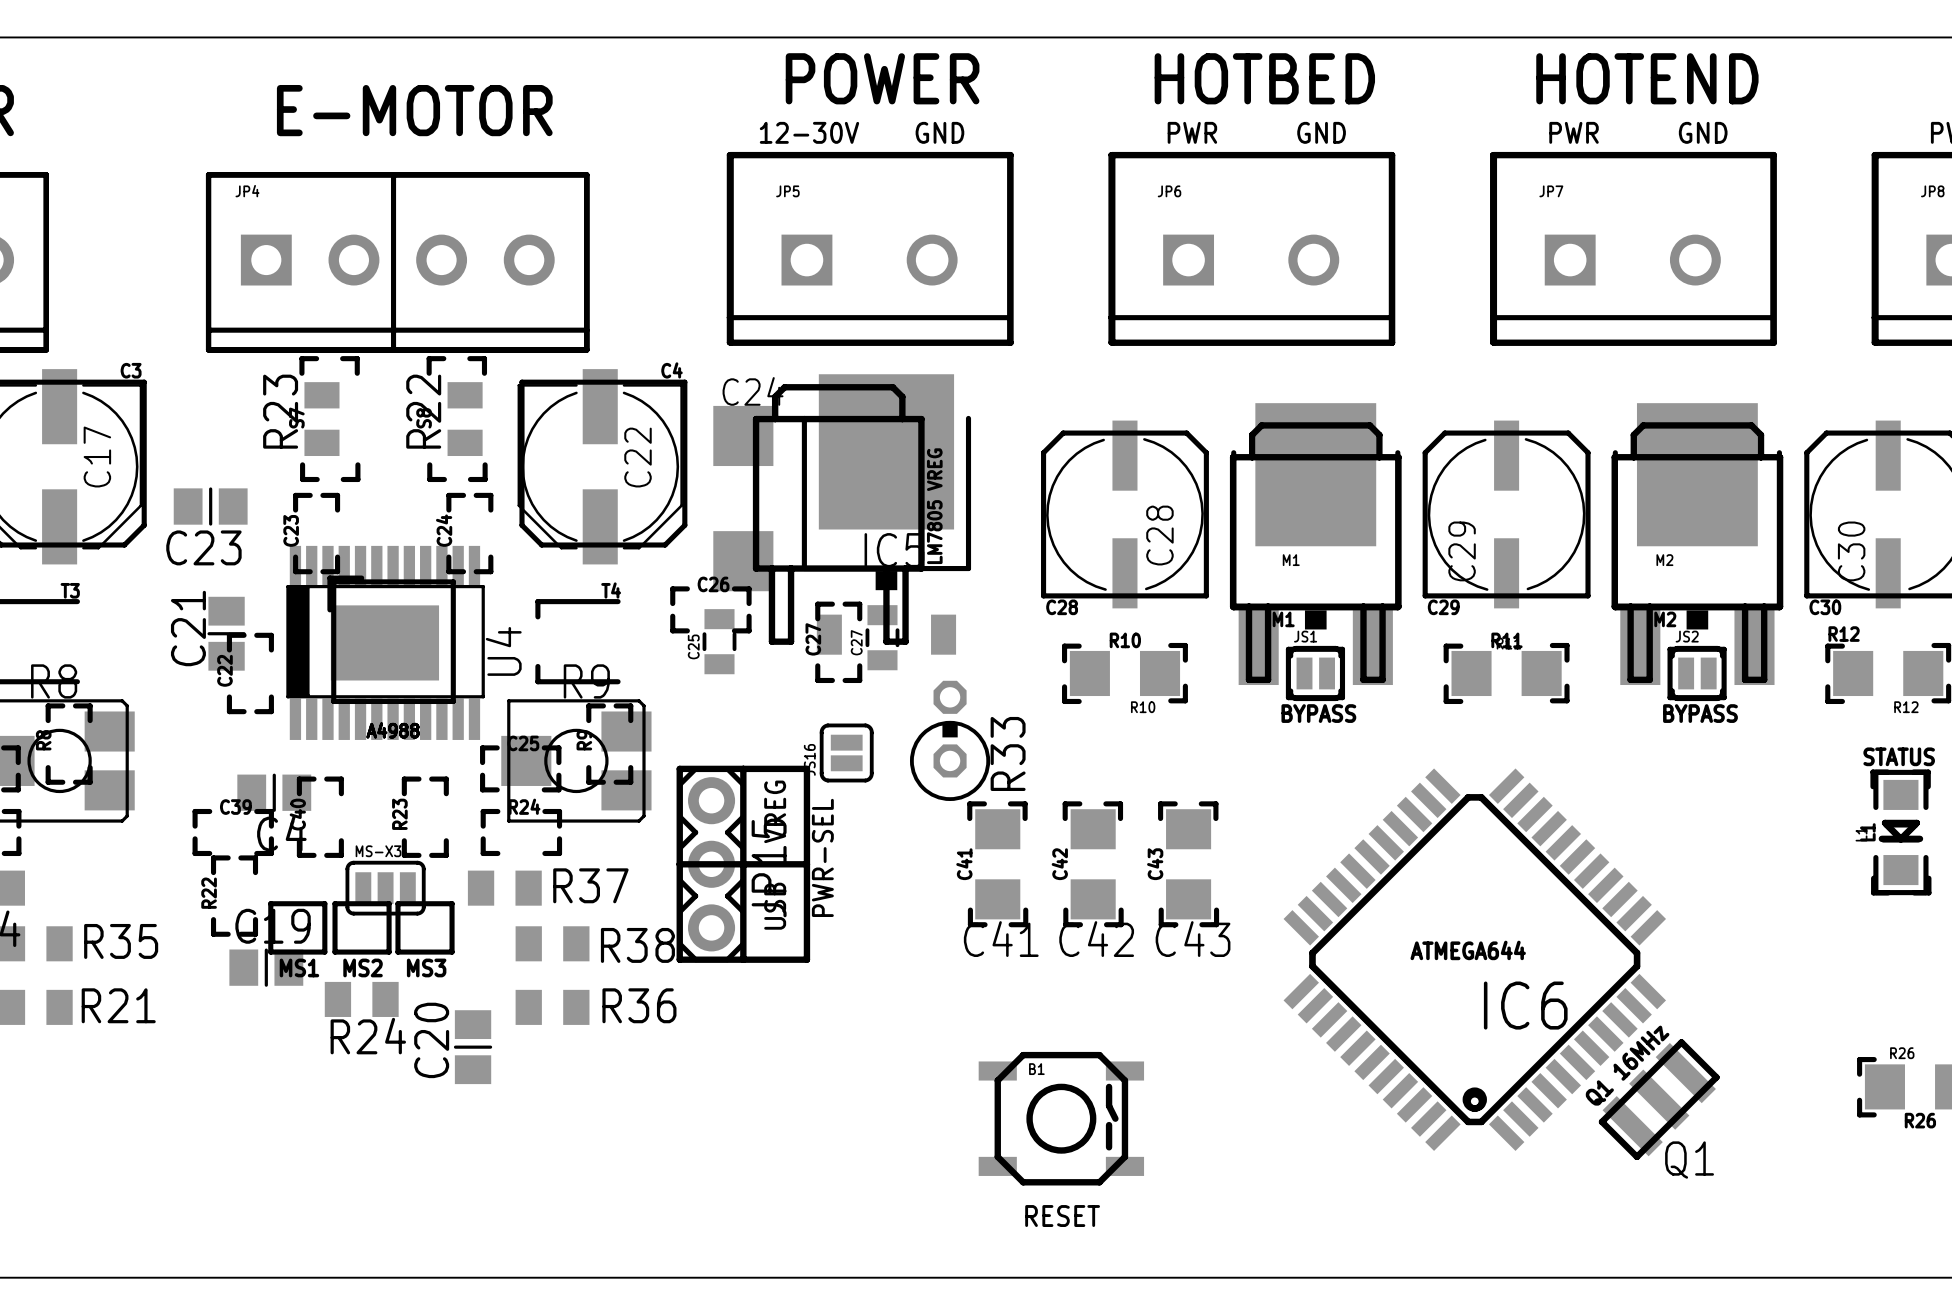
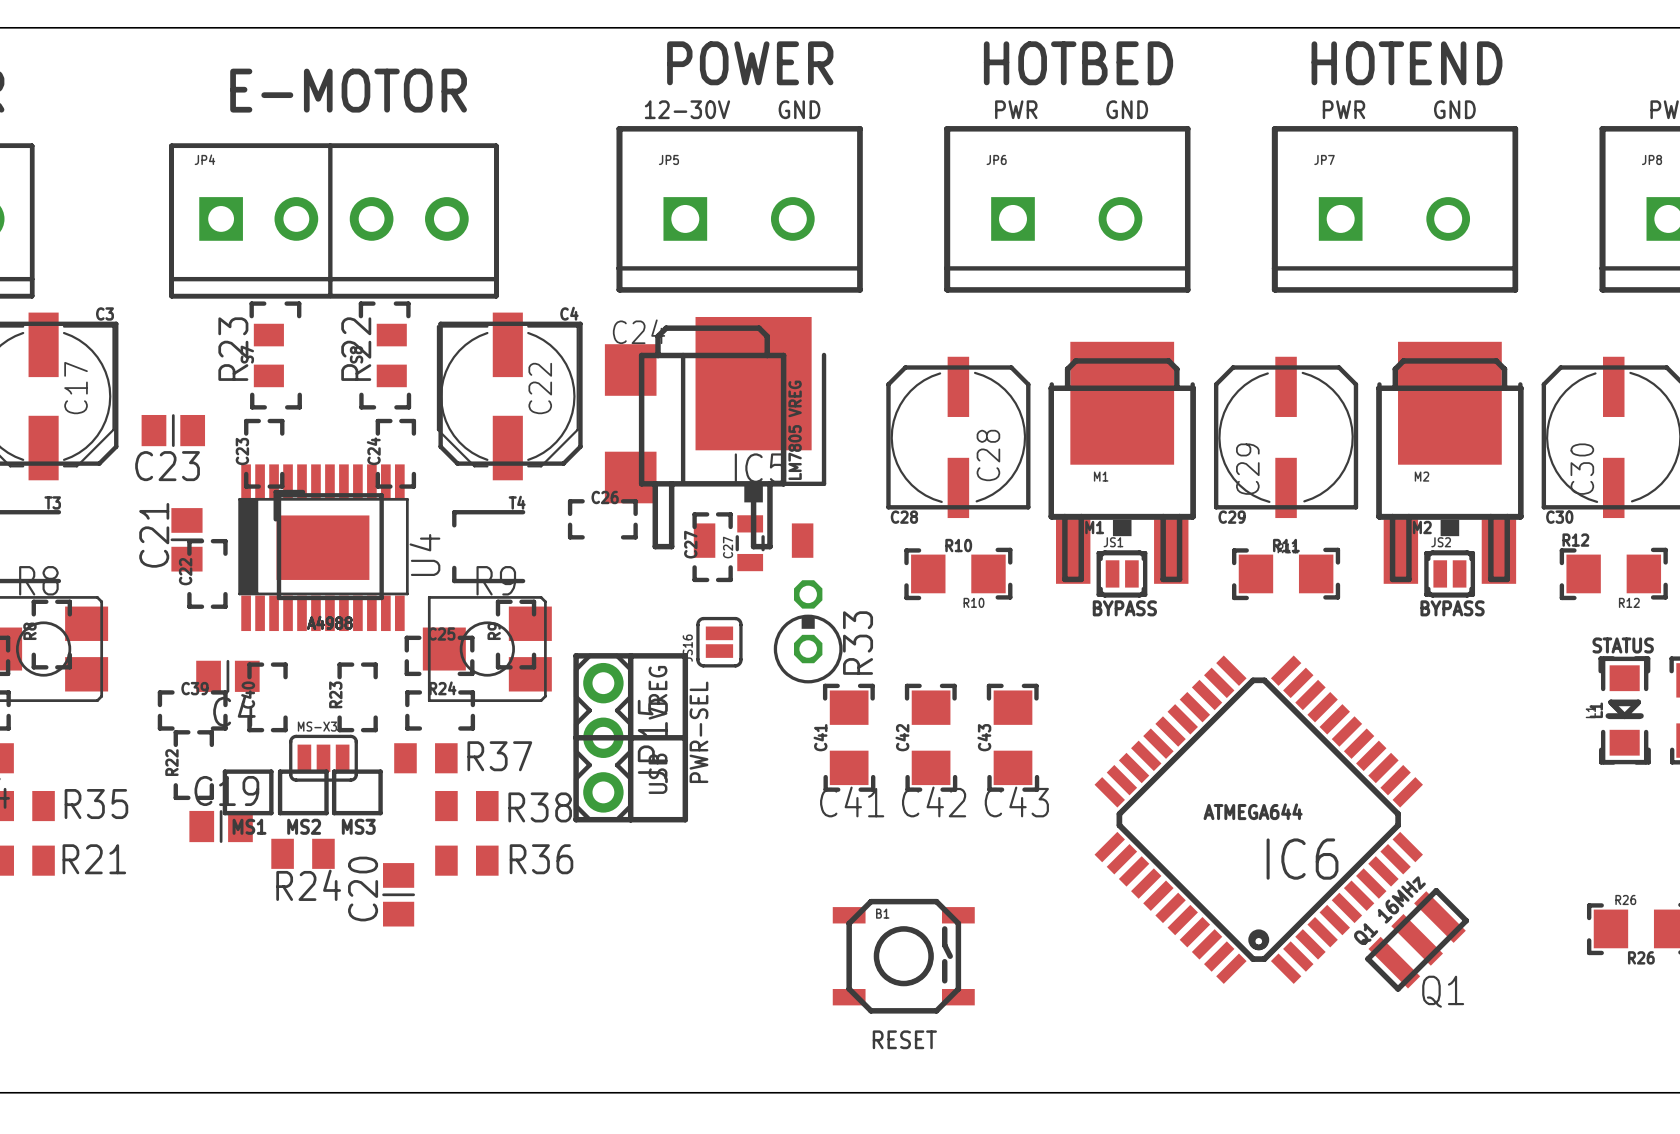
C25: (719, 641) -> none

